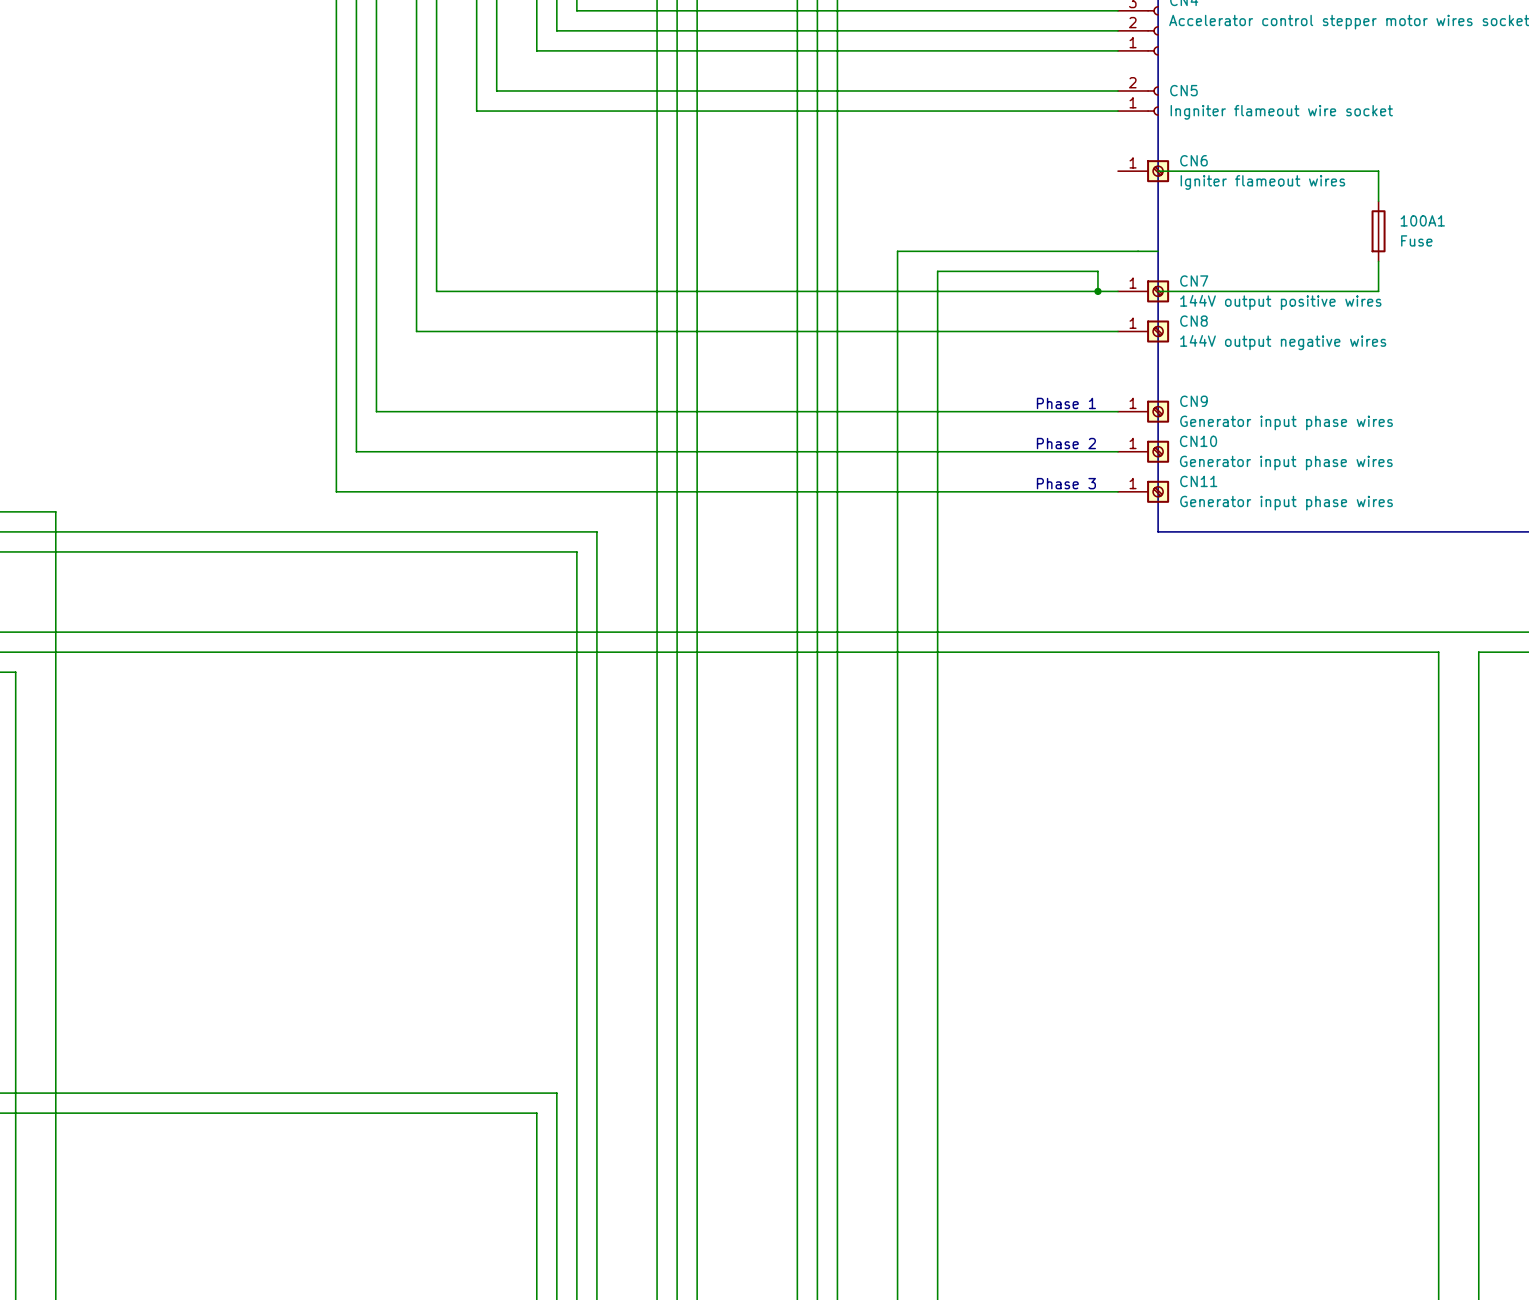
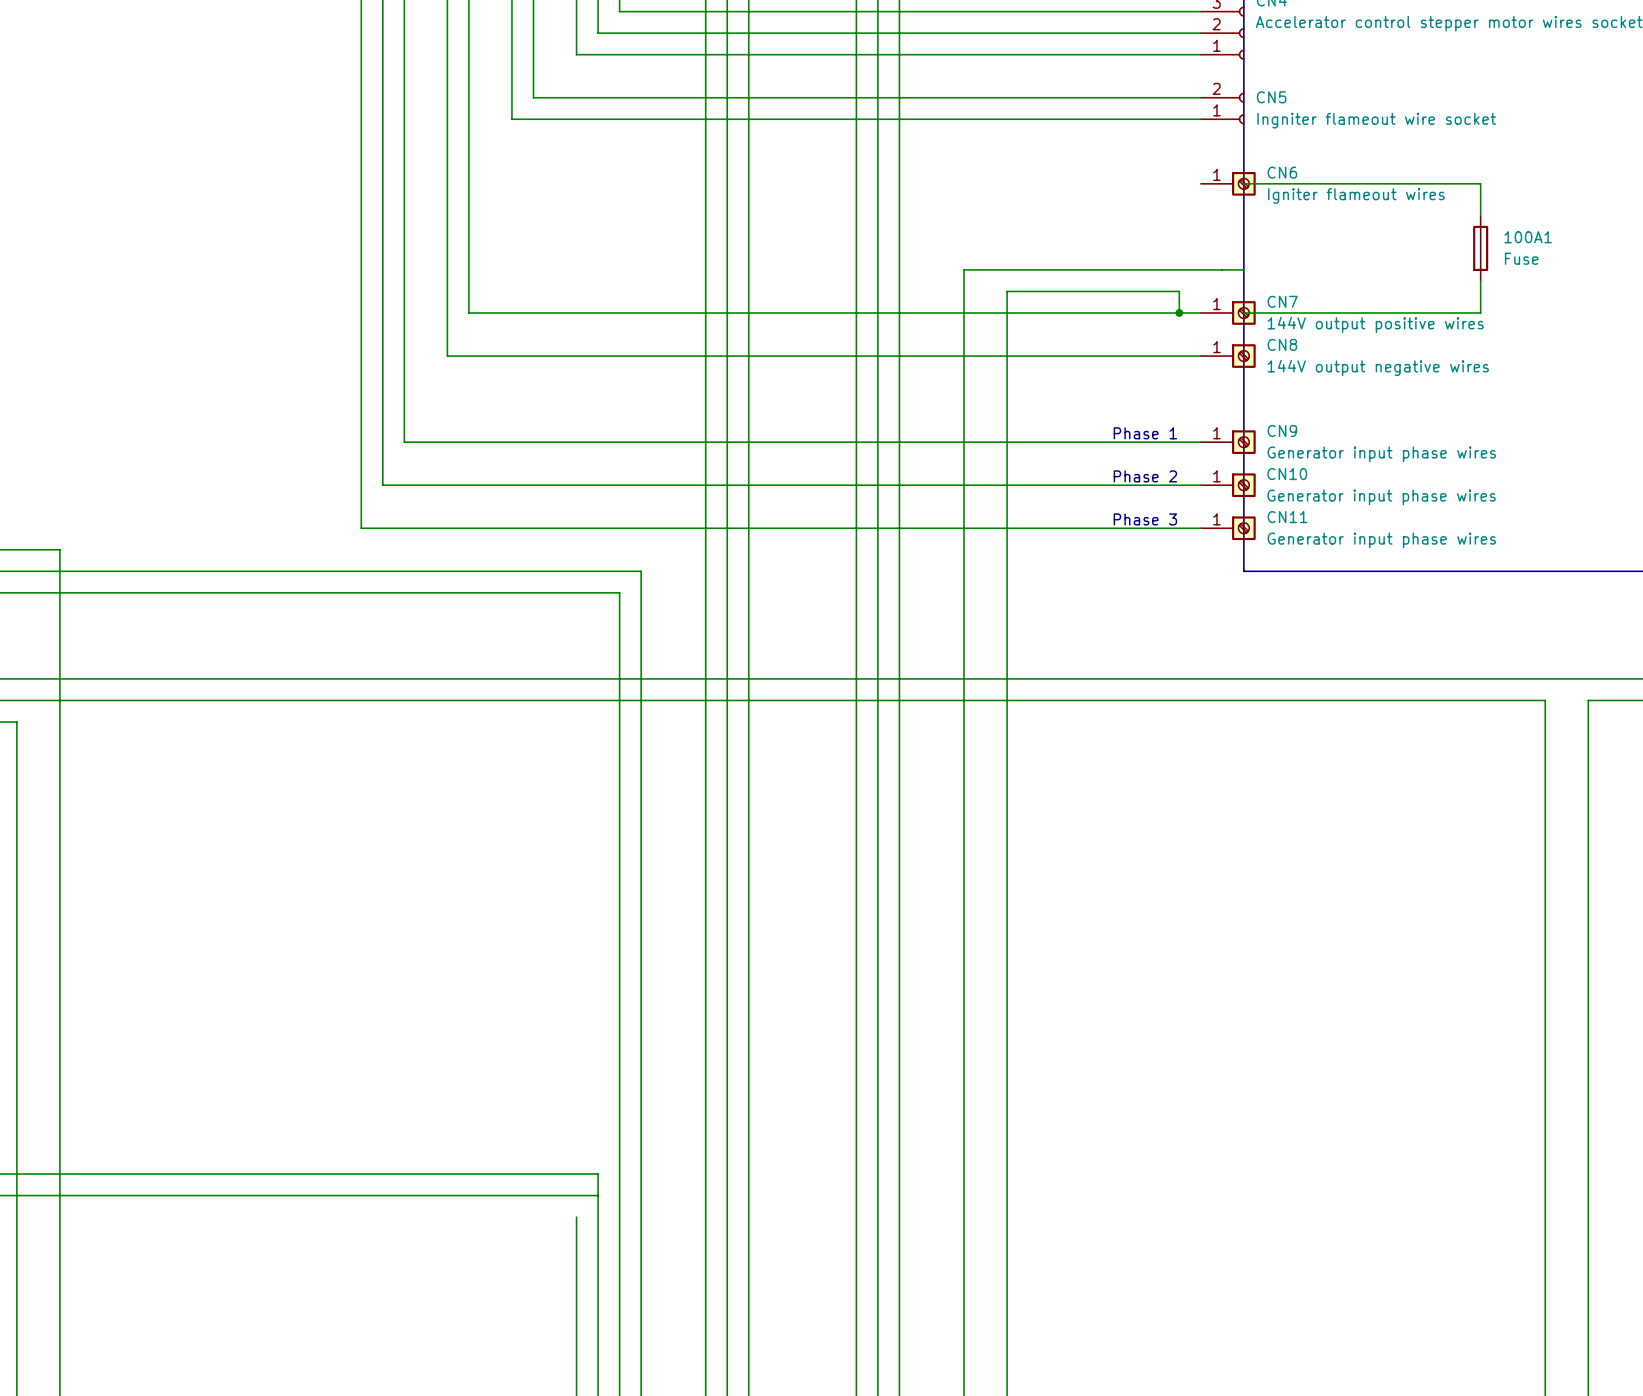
wire: (536, 1113) (536, 1133) -> (576, 1195) (598, 1195)

